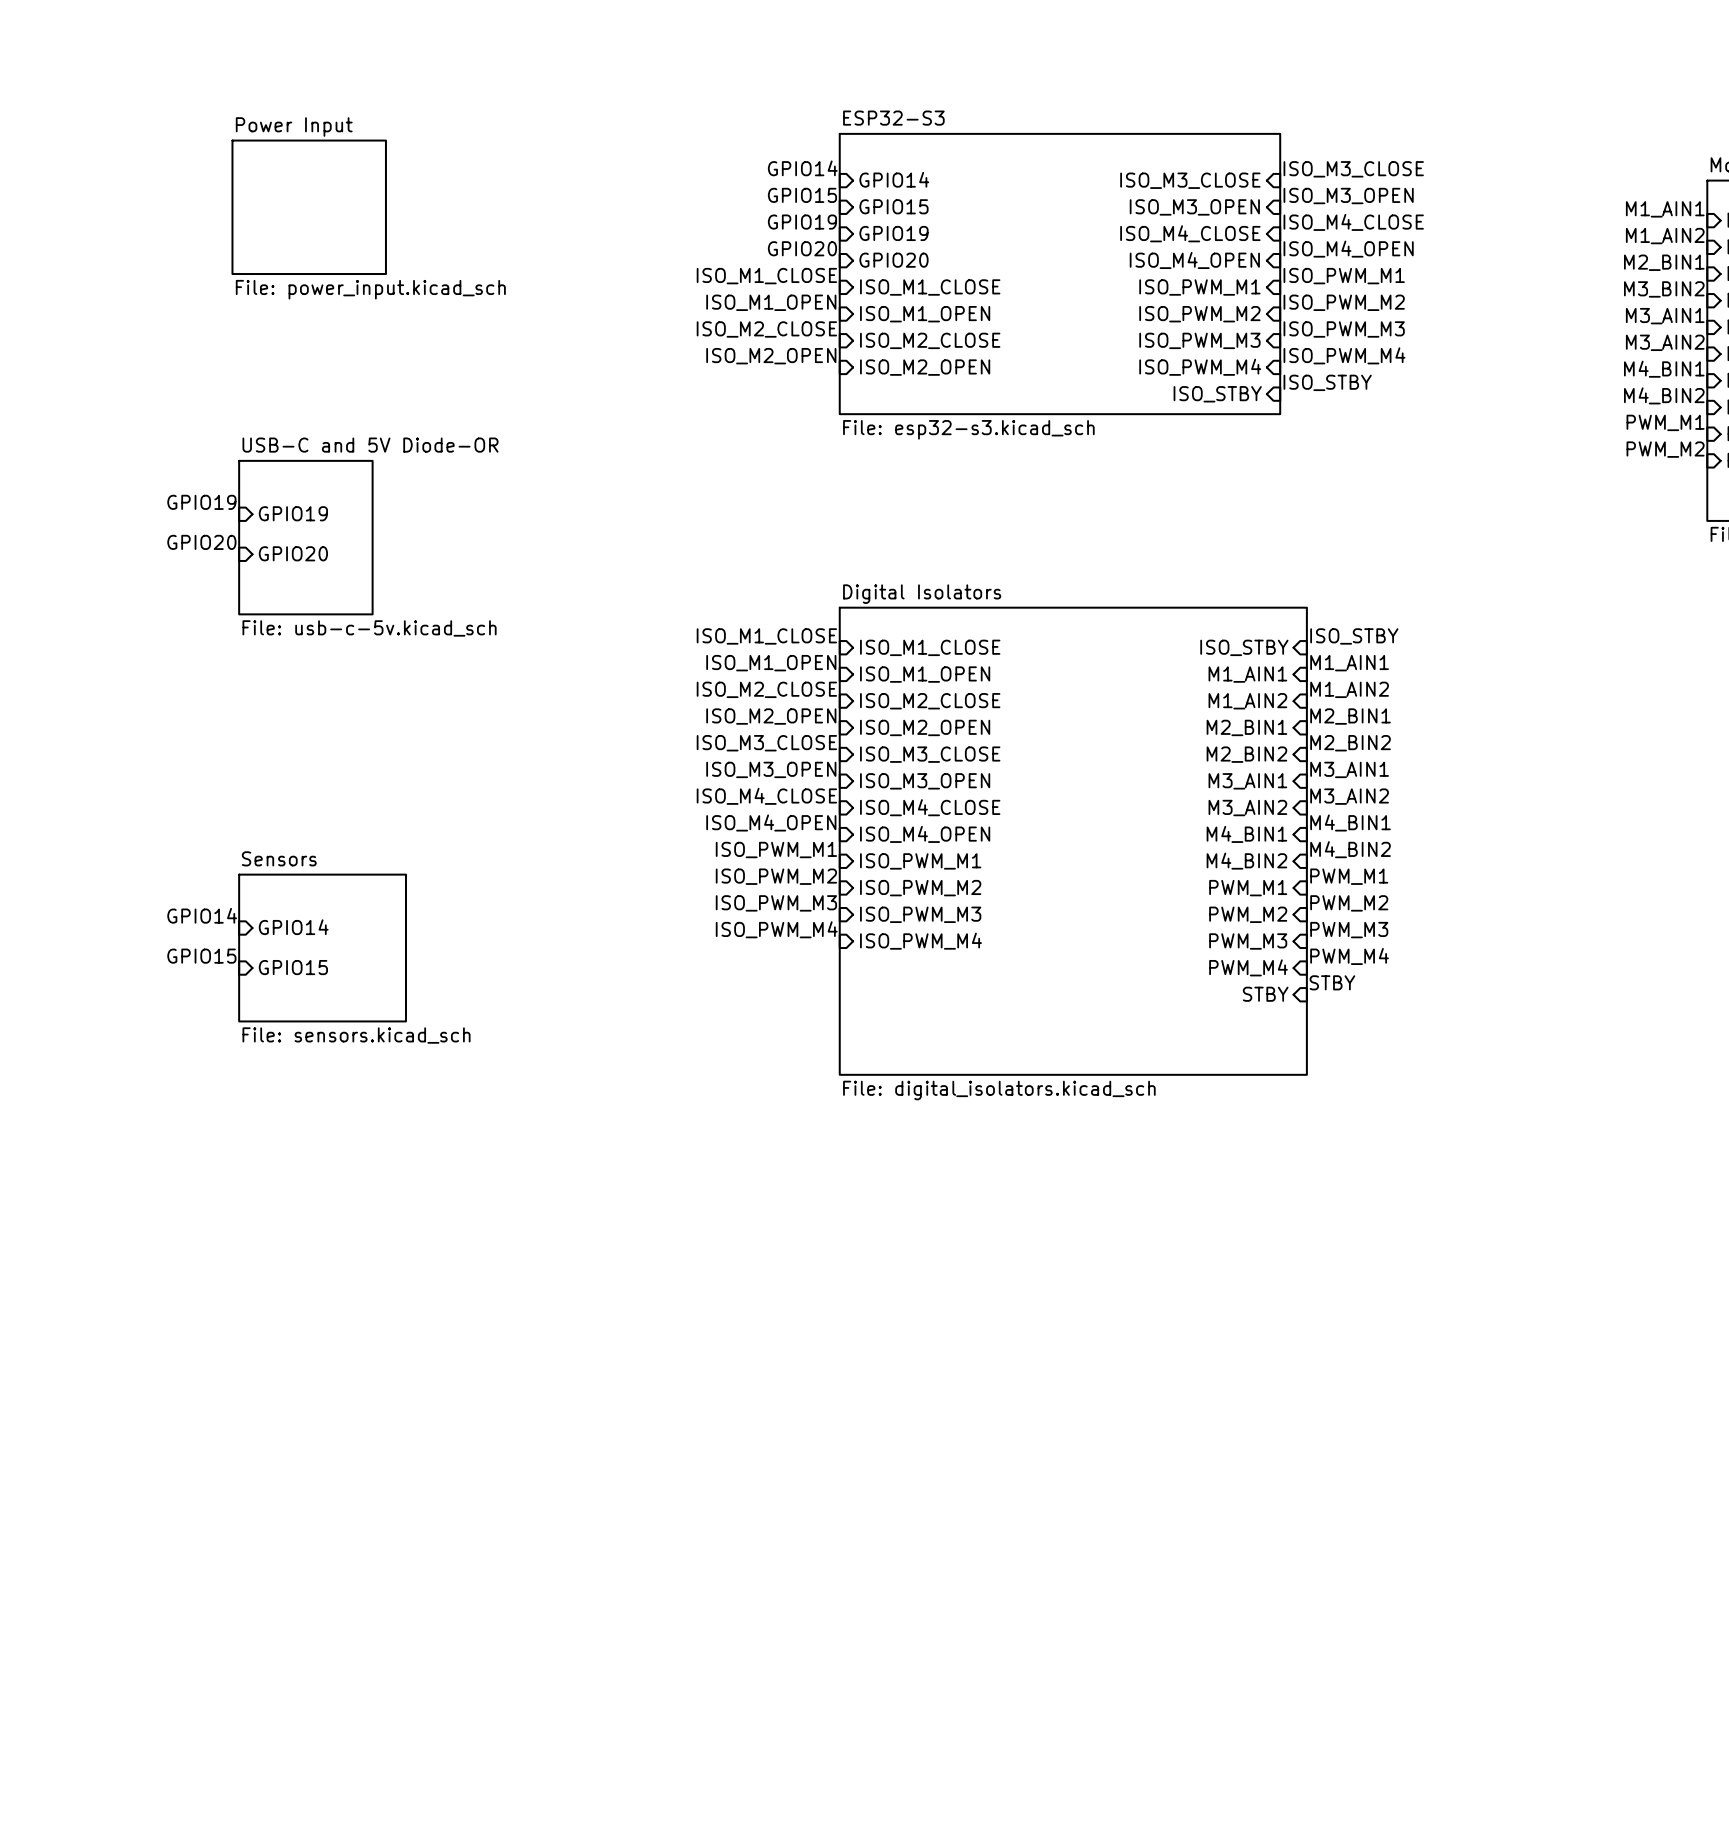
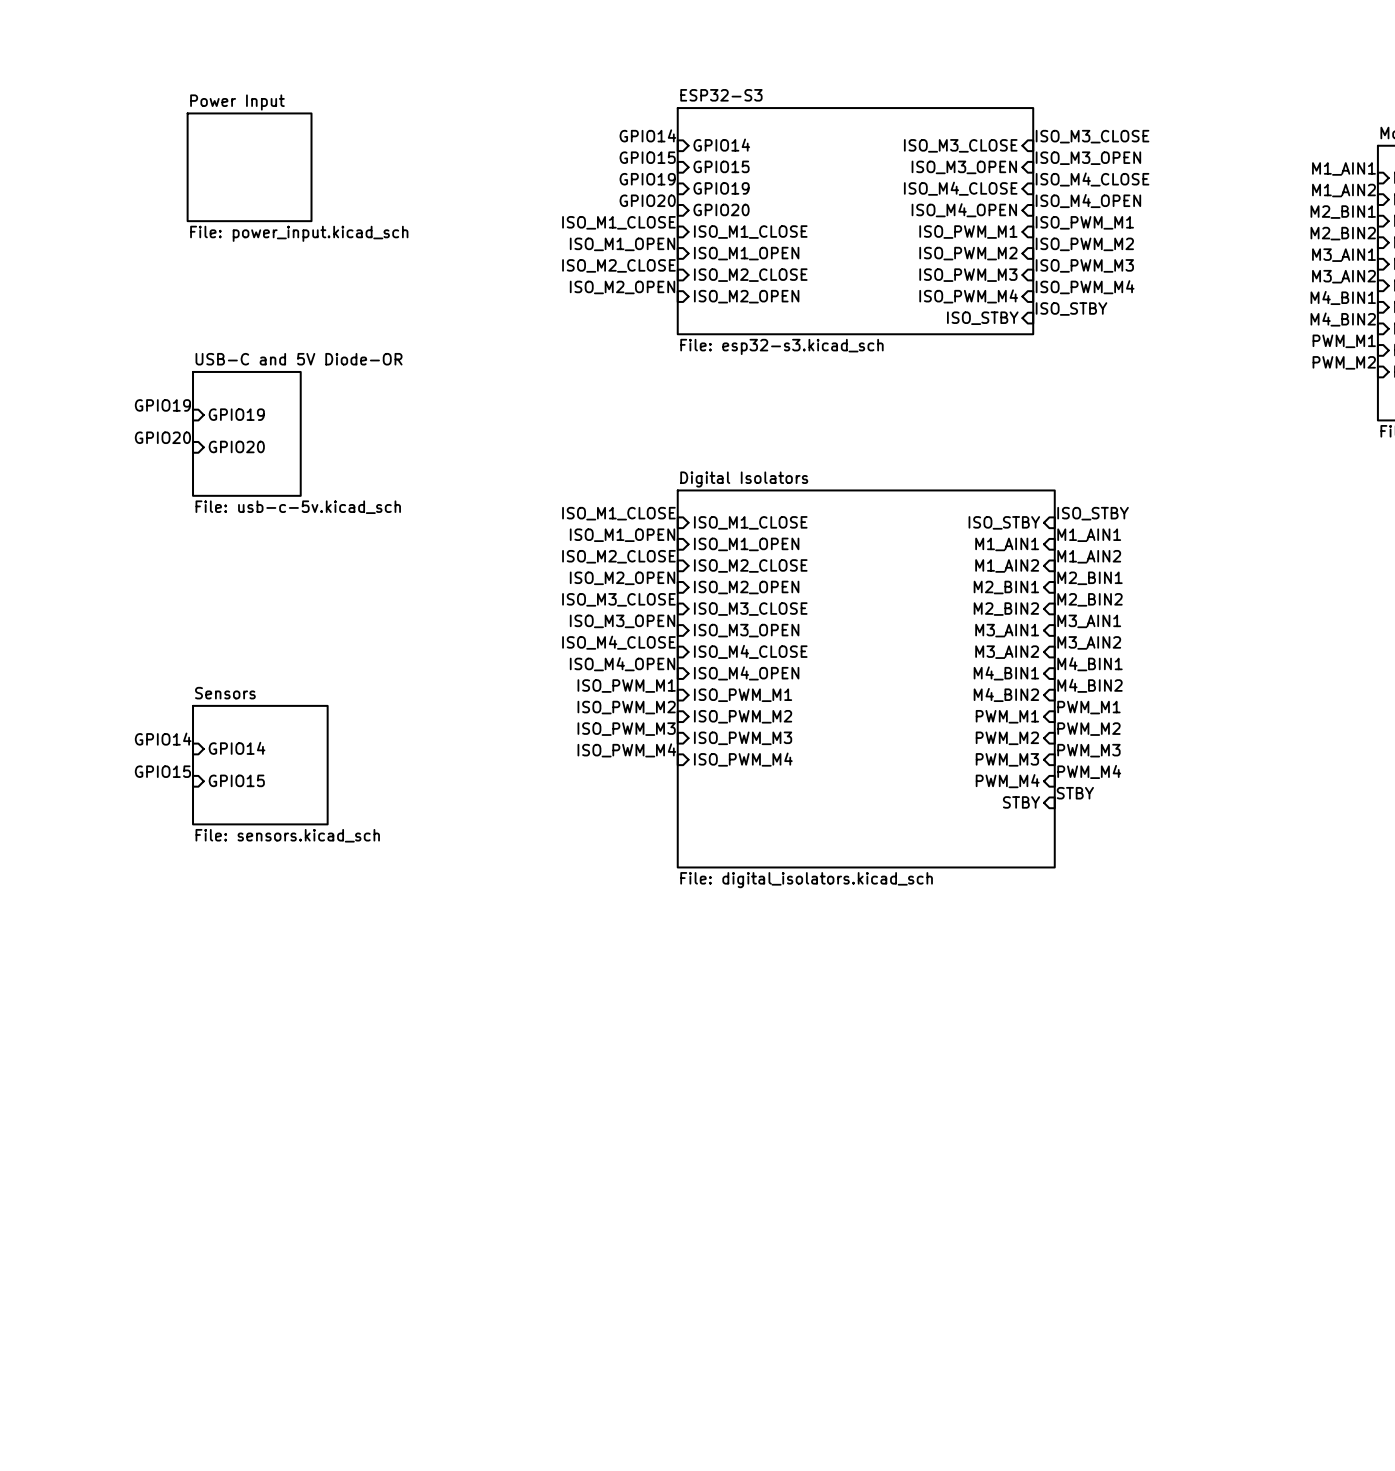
label: M3_BIN2 (1664, 289) -> M2_BIN2 (1343, 233)

